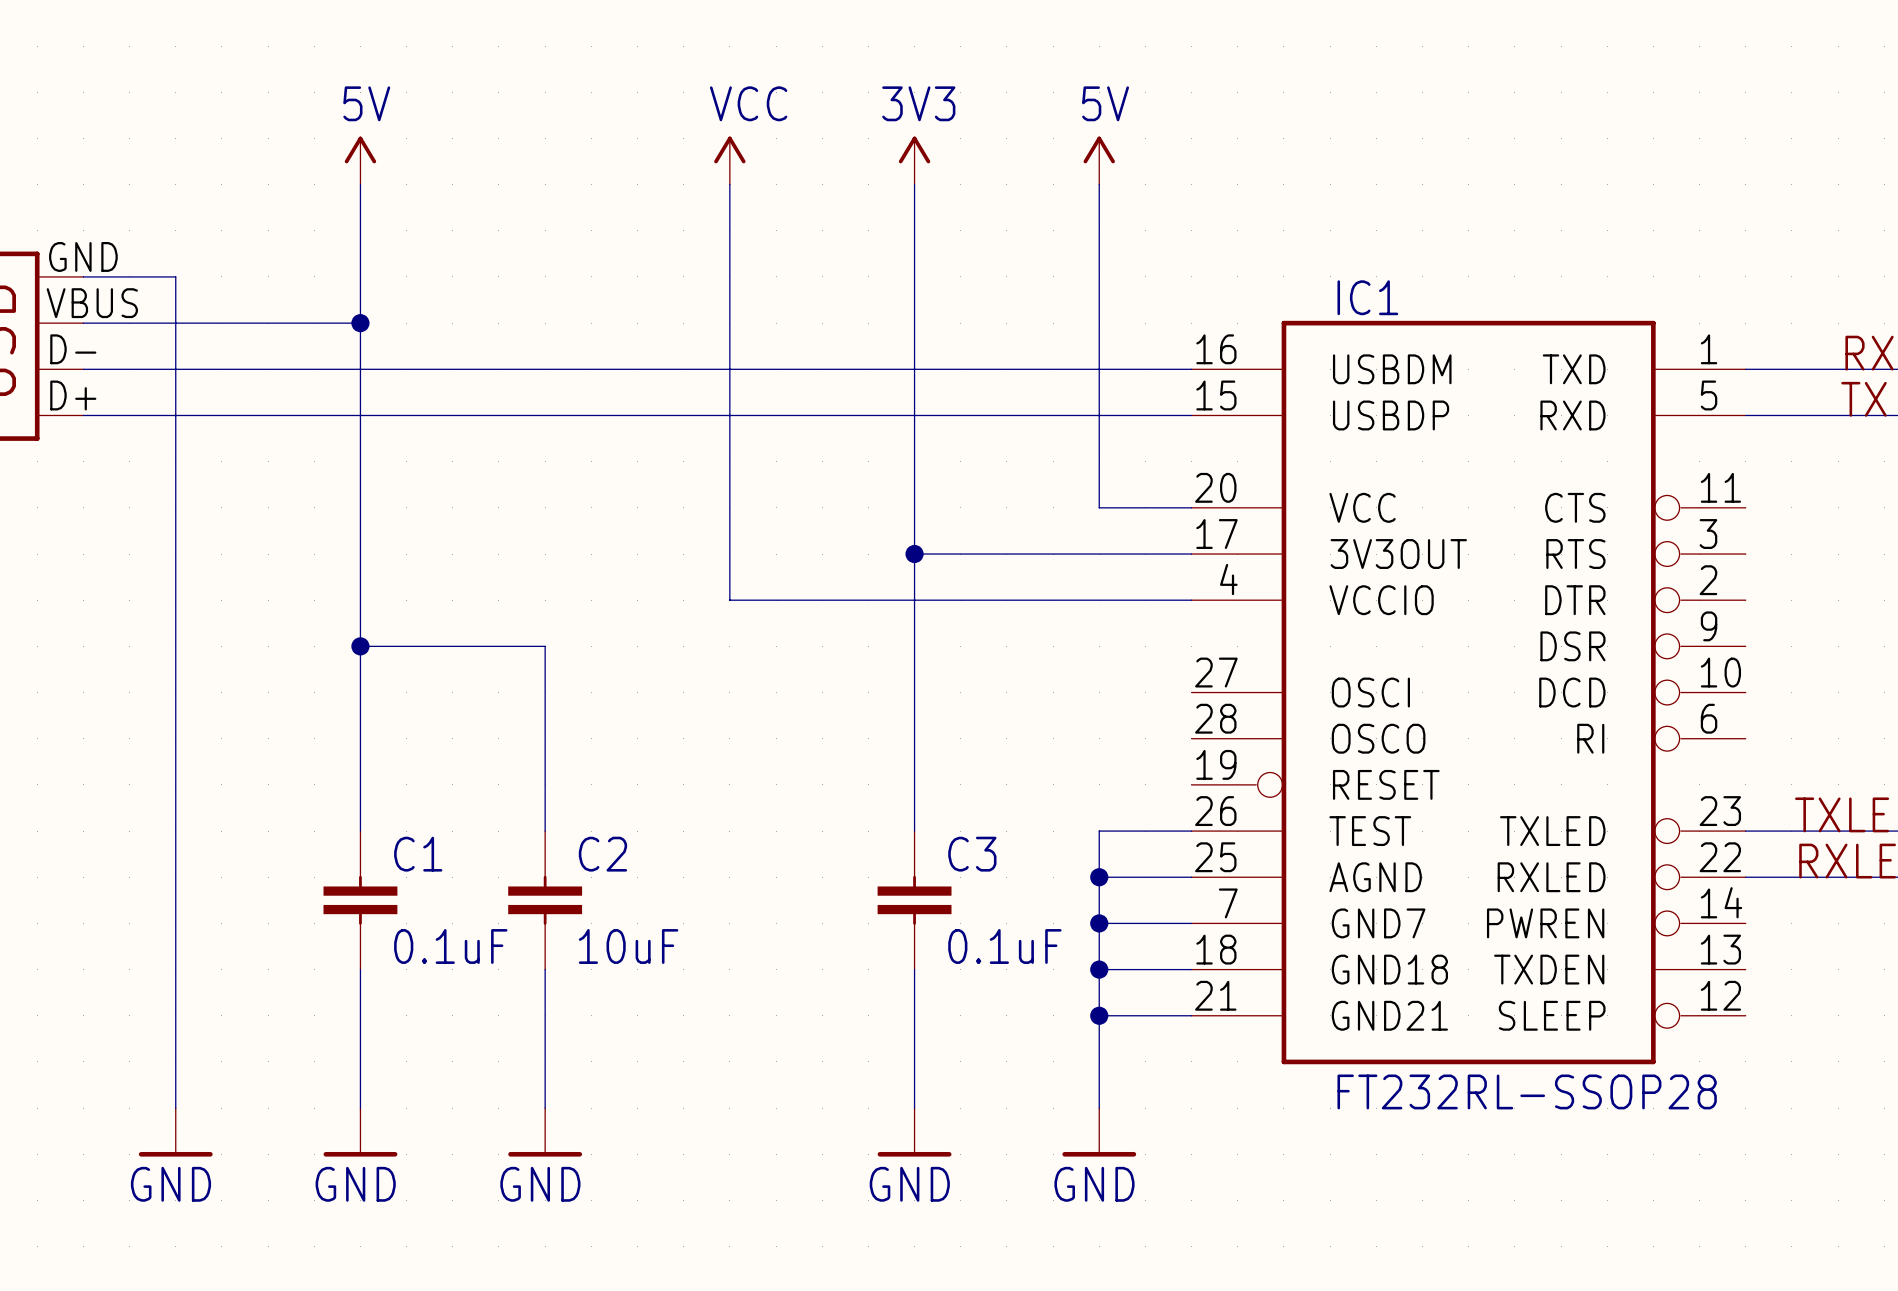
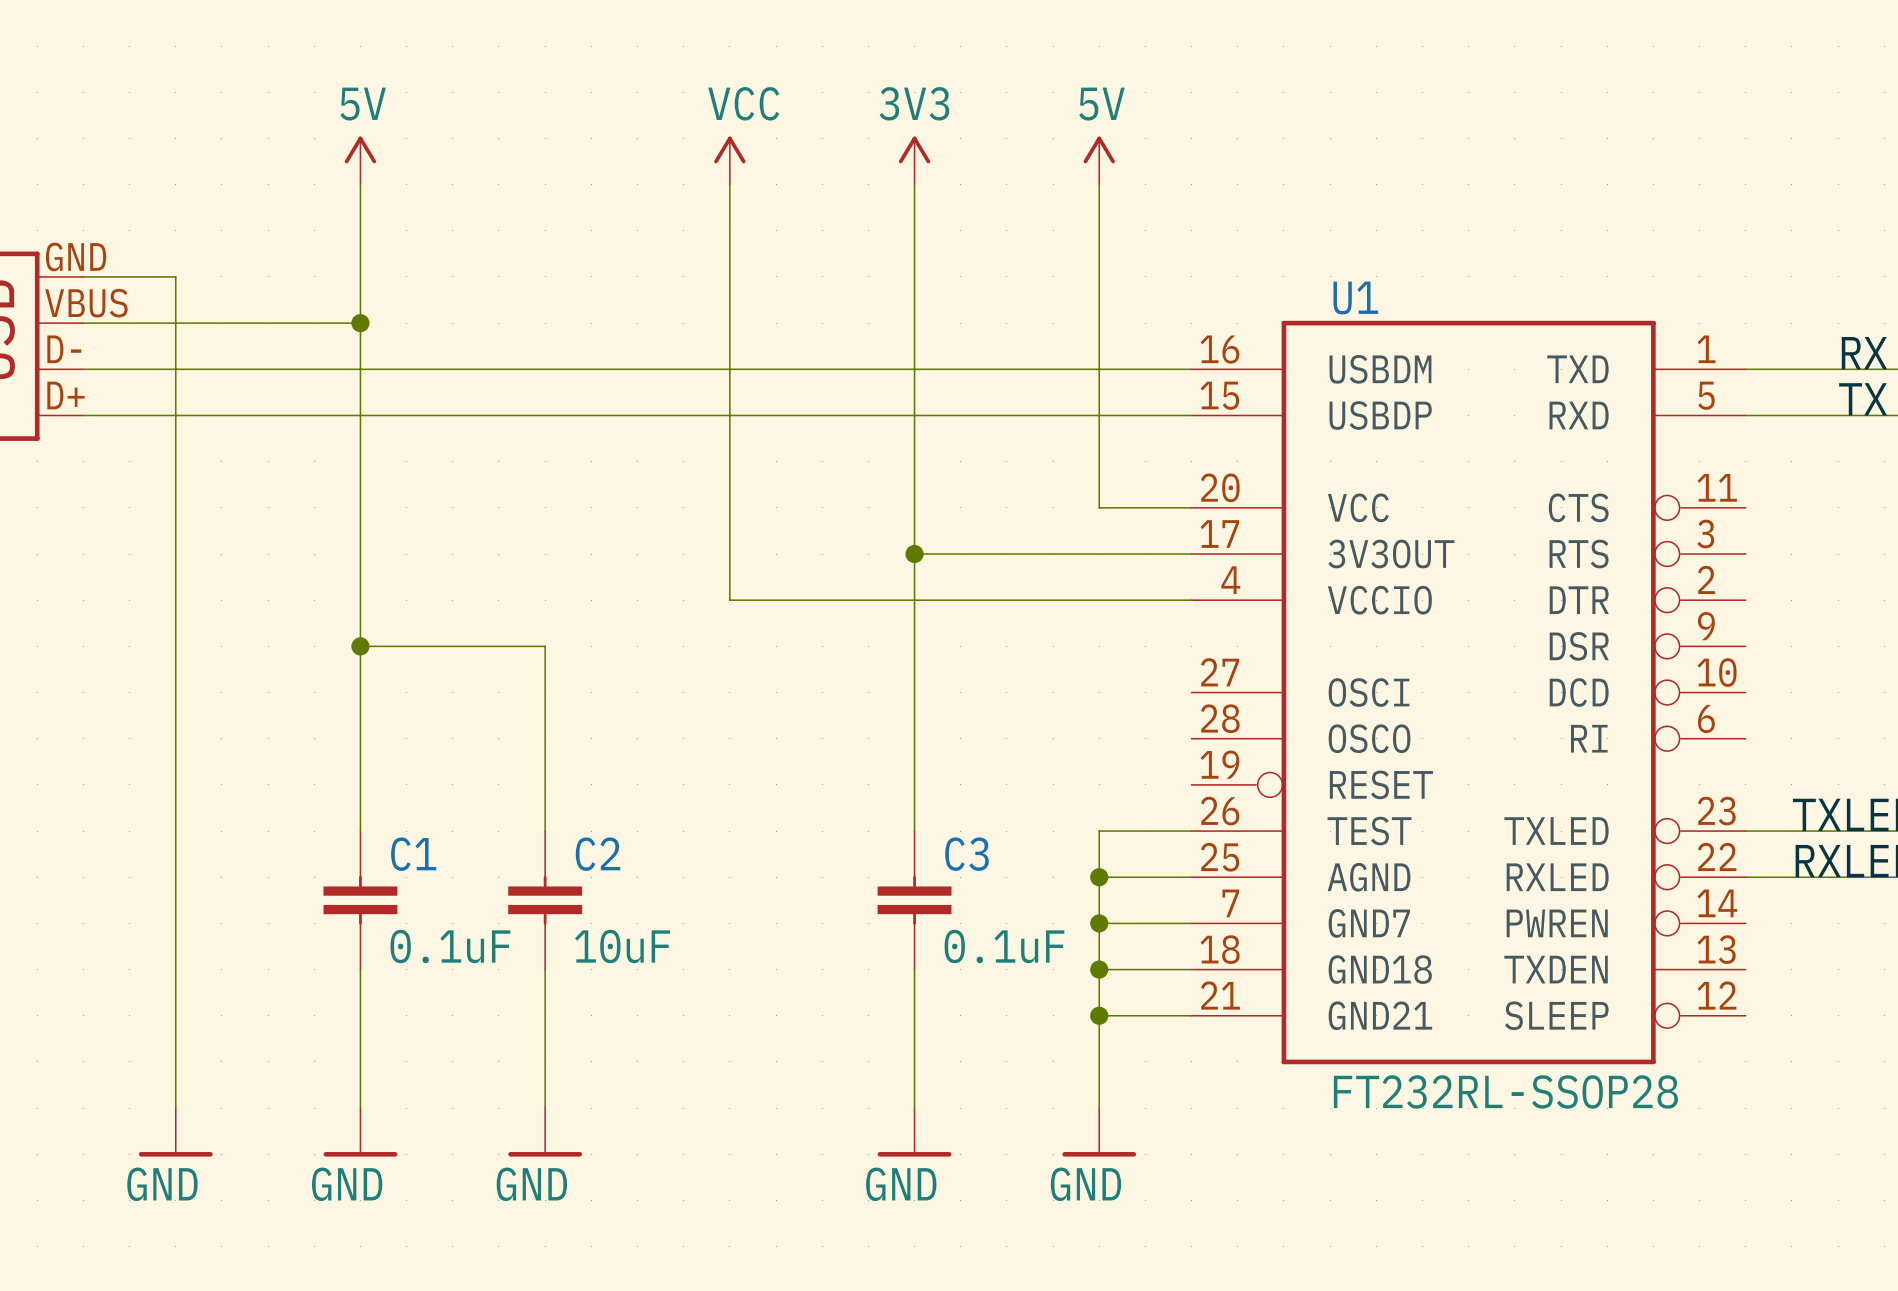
IC1 name: IC1 (1367, 297) -> U1 (1355, 298)

